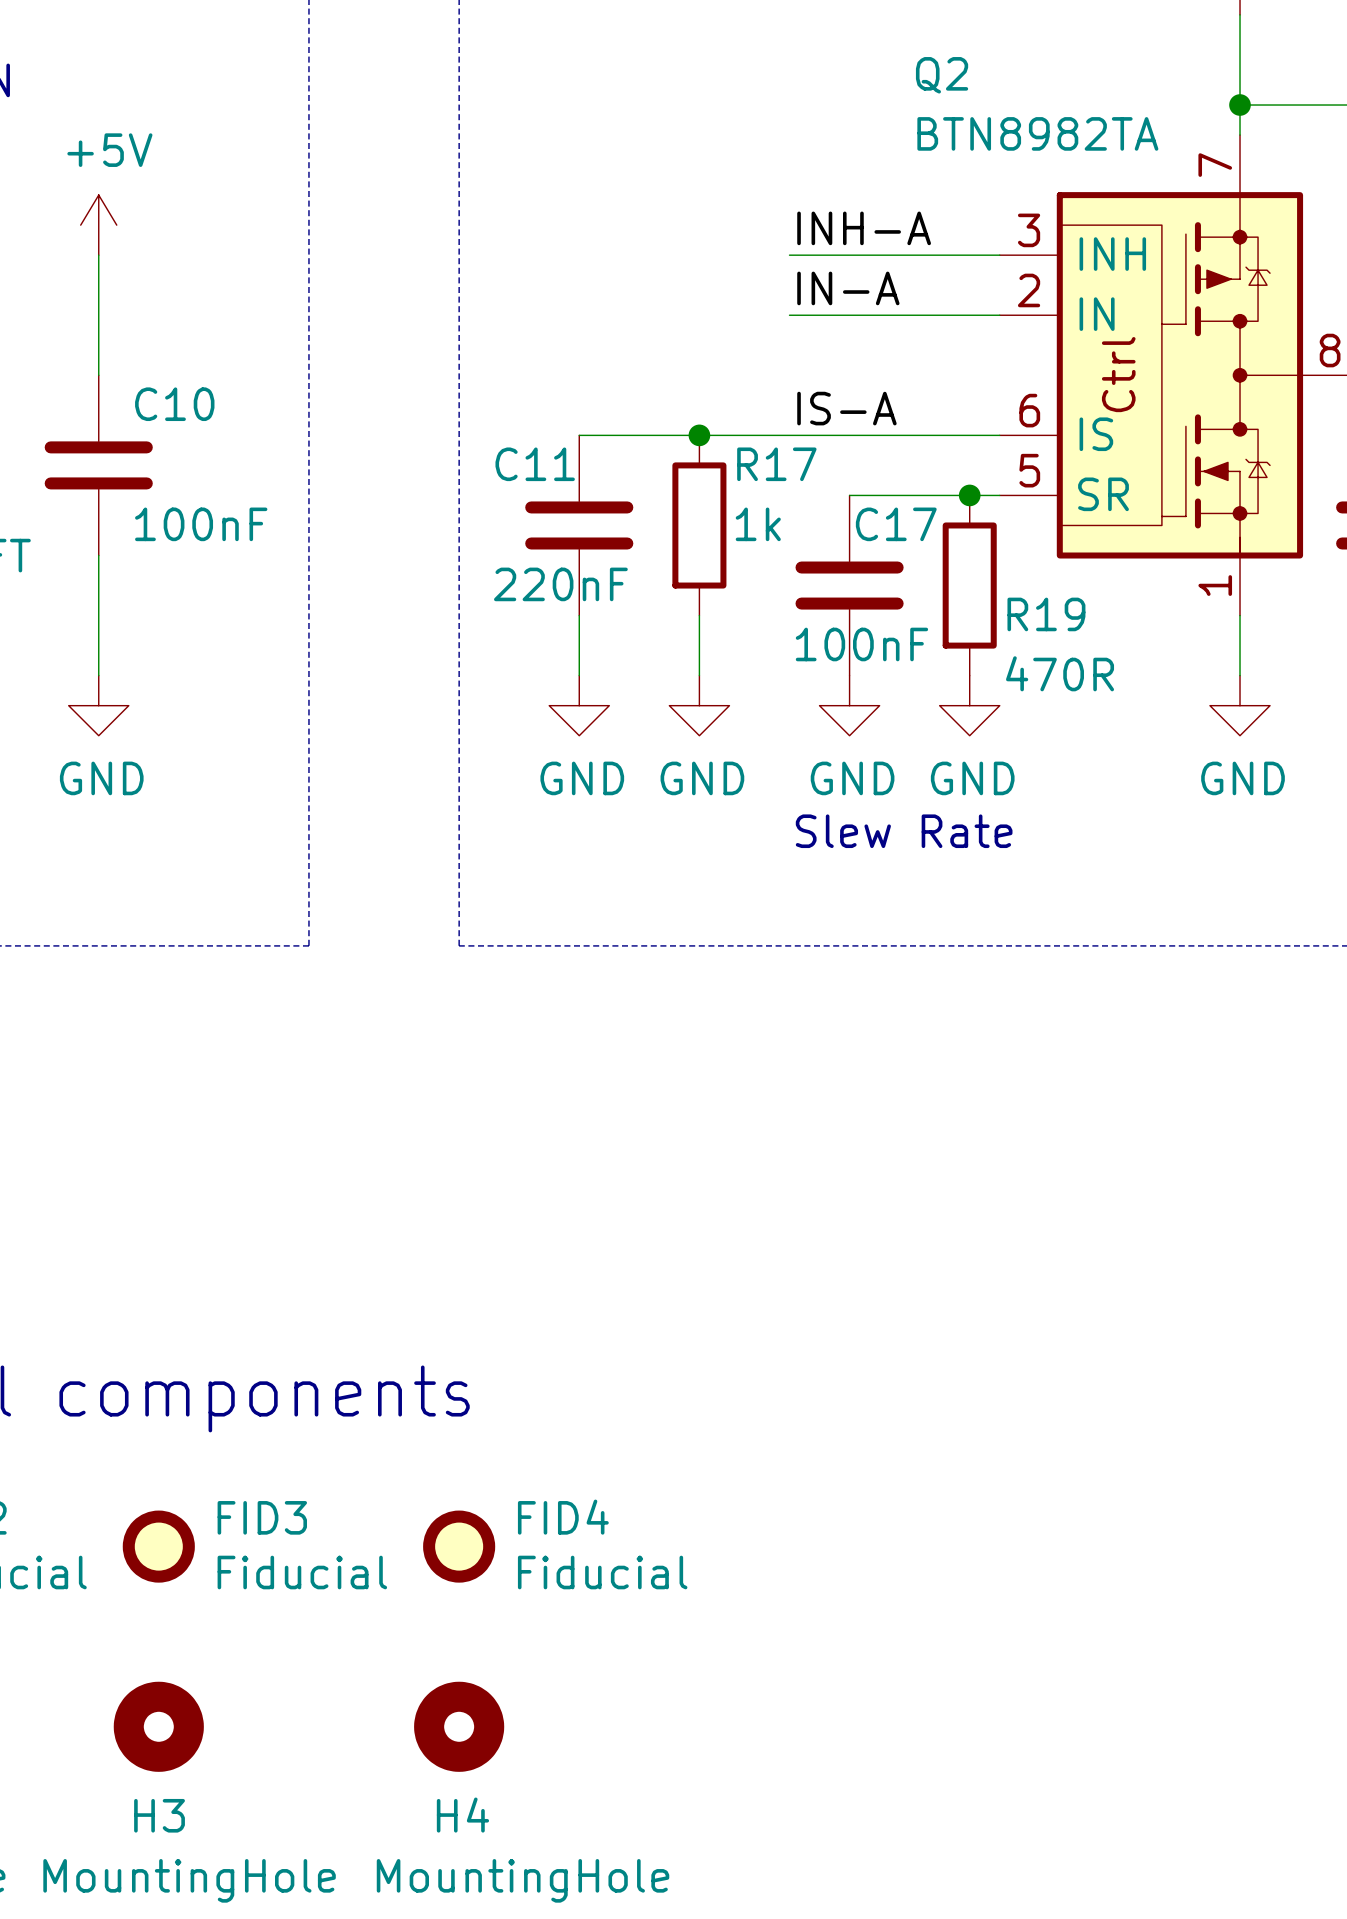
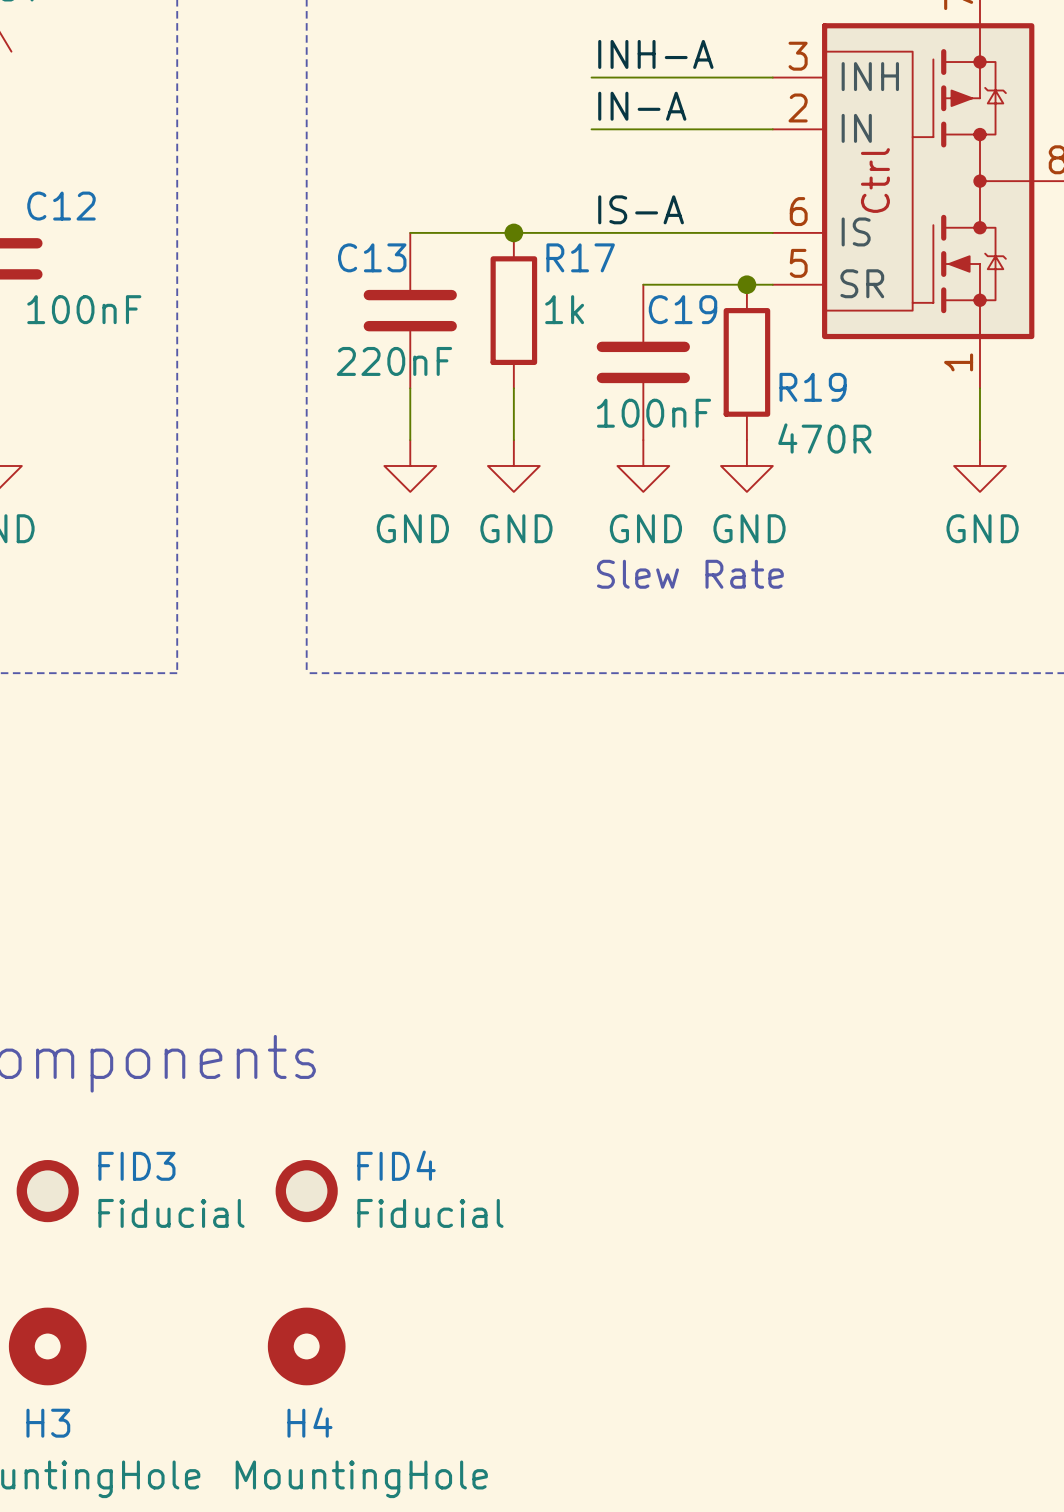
C10 name: C10 (174, 404) -> C12 (61, 206)
C11 name: C11 (535, 464) -> C13 (372, 257)
C17 name: C17 (896, 524) -> C19 (682, 309)

